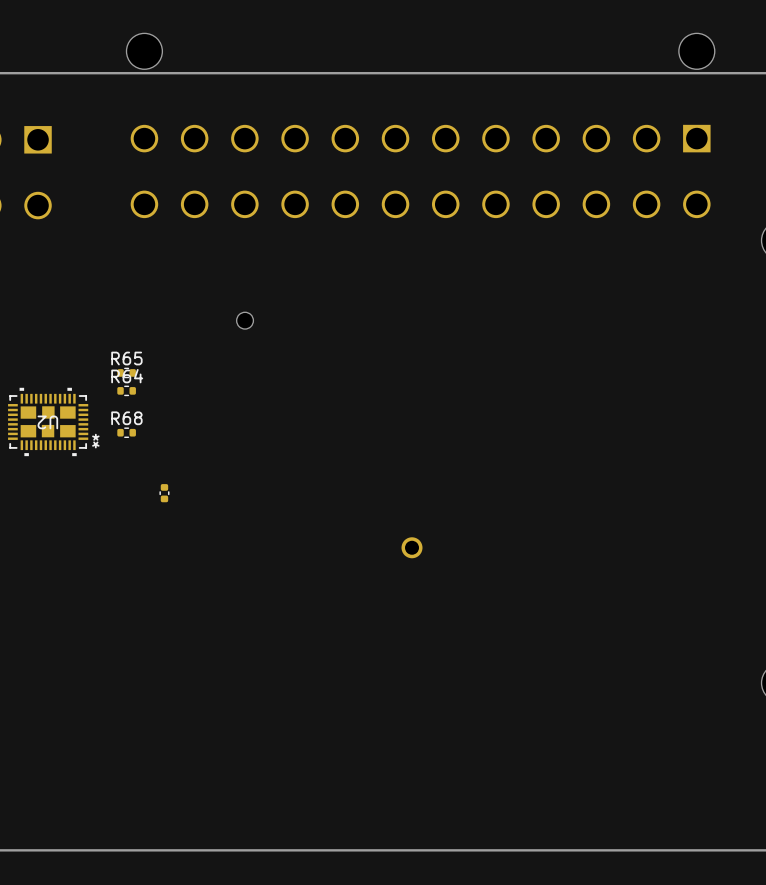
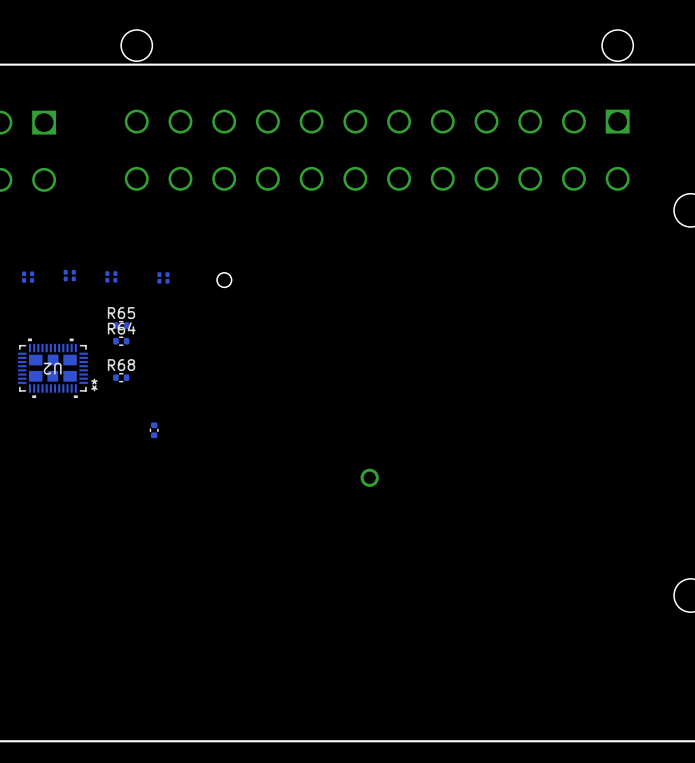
part: none -> (65, 275)
part: none -> (73, 275)
part: none -> (107, 276)
part: none -> (115, 276)
part: none -> (24, 277)
part: none -> (32, 277)
part: none -> (159, 277)
part: none -> (167, 277)

